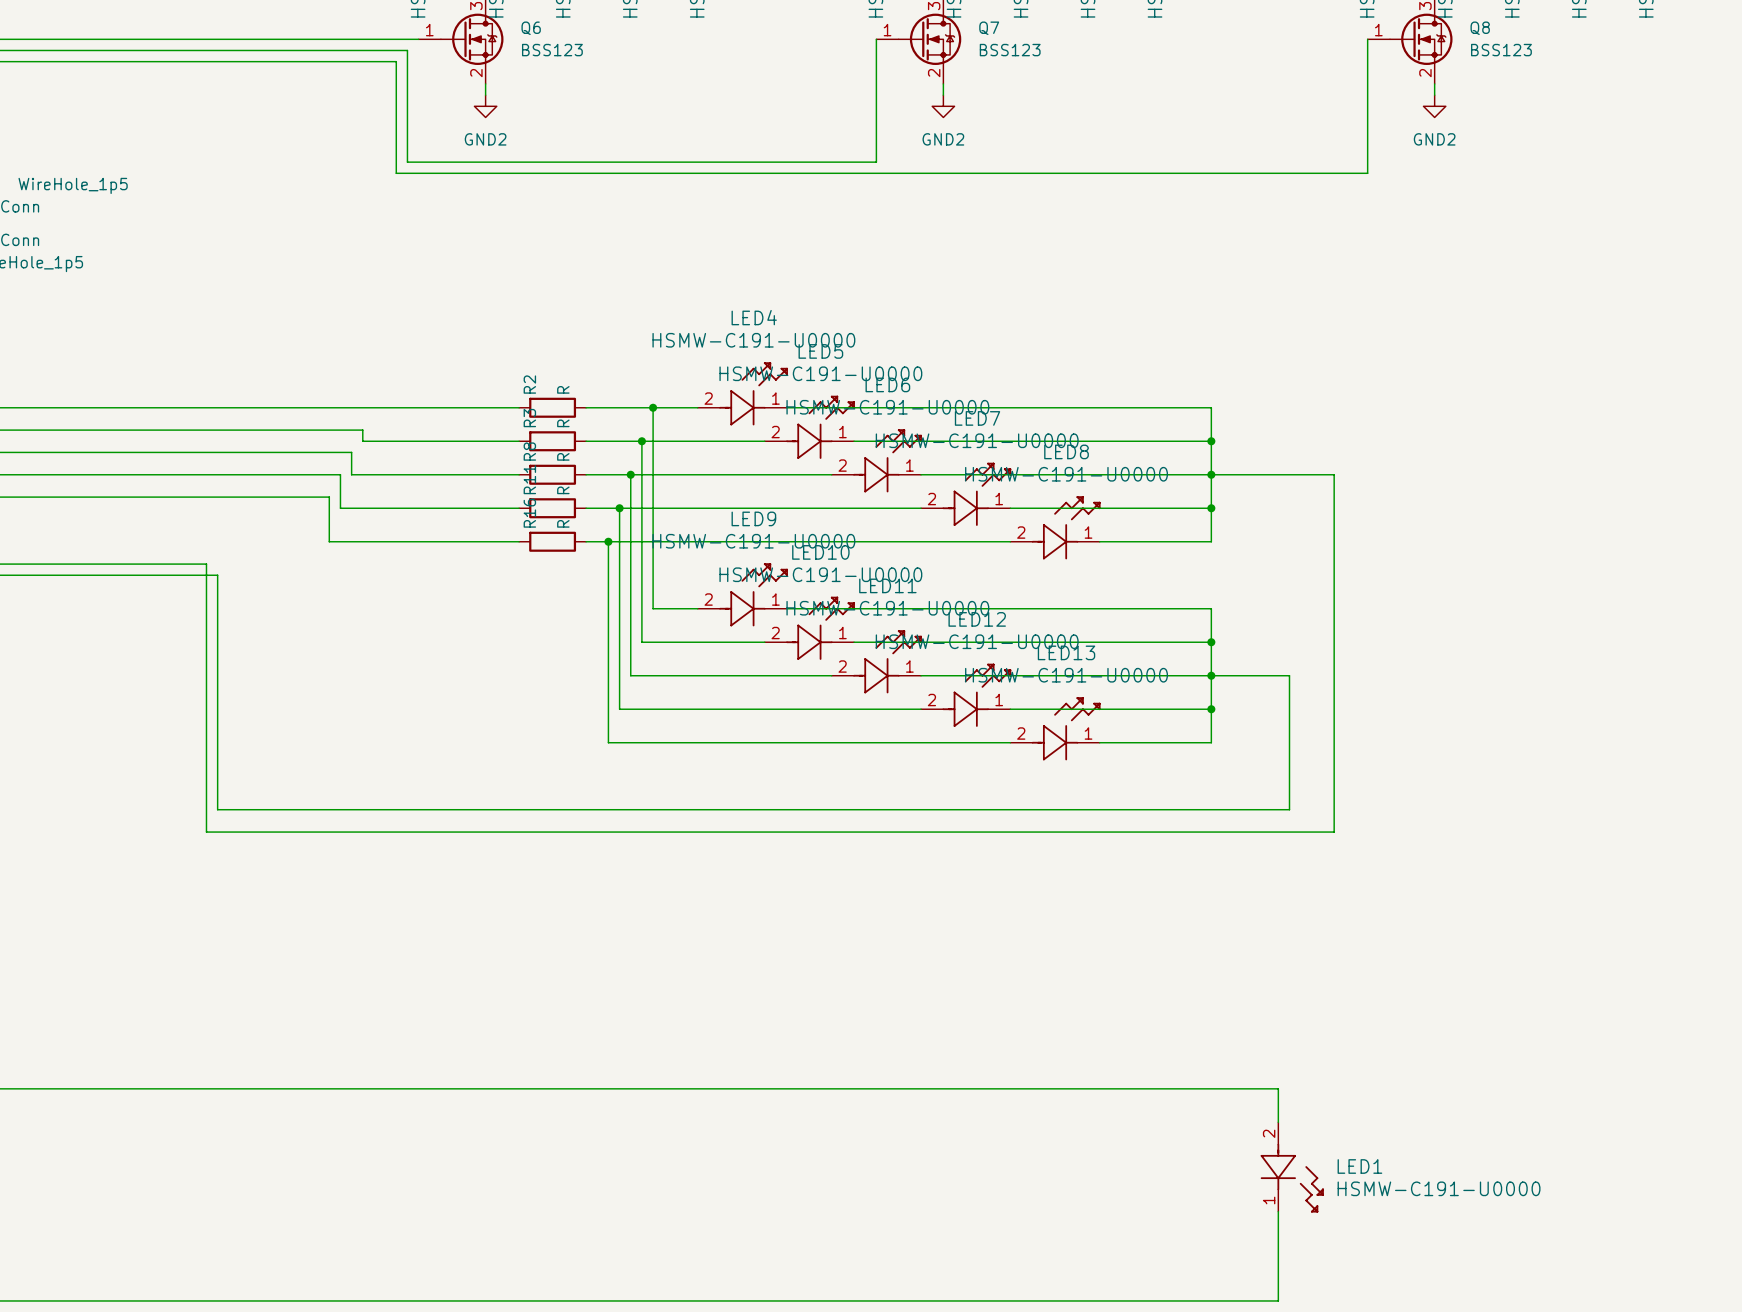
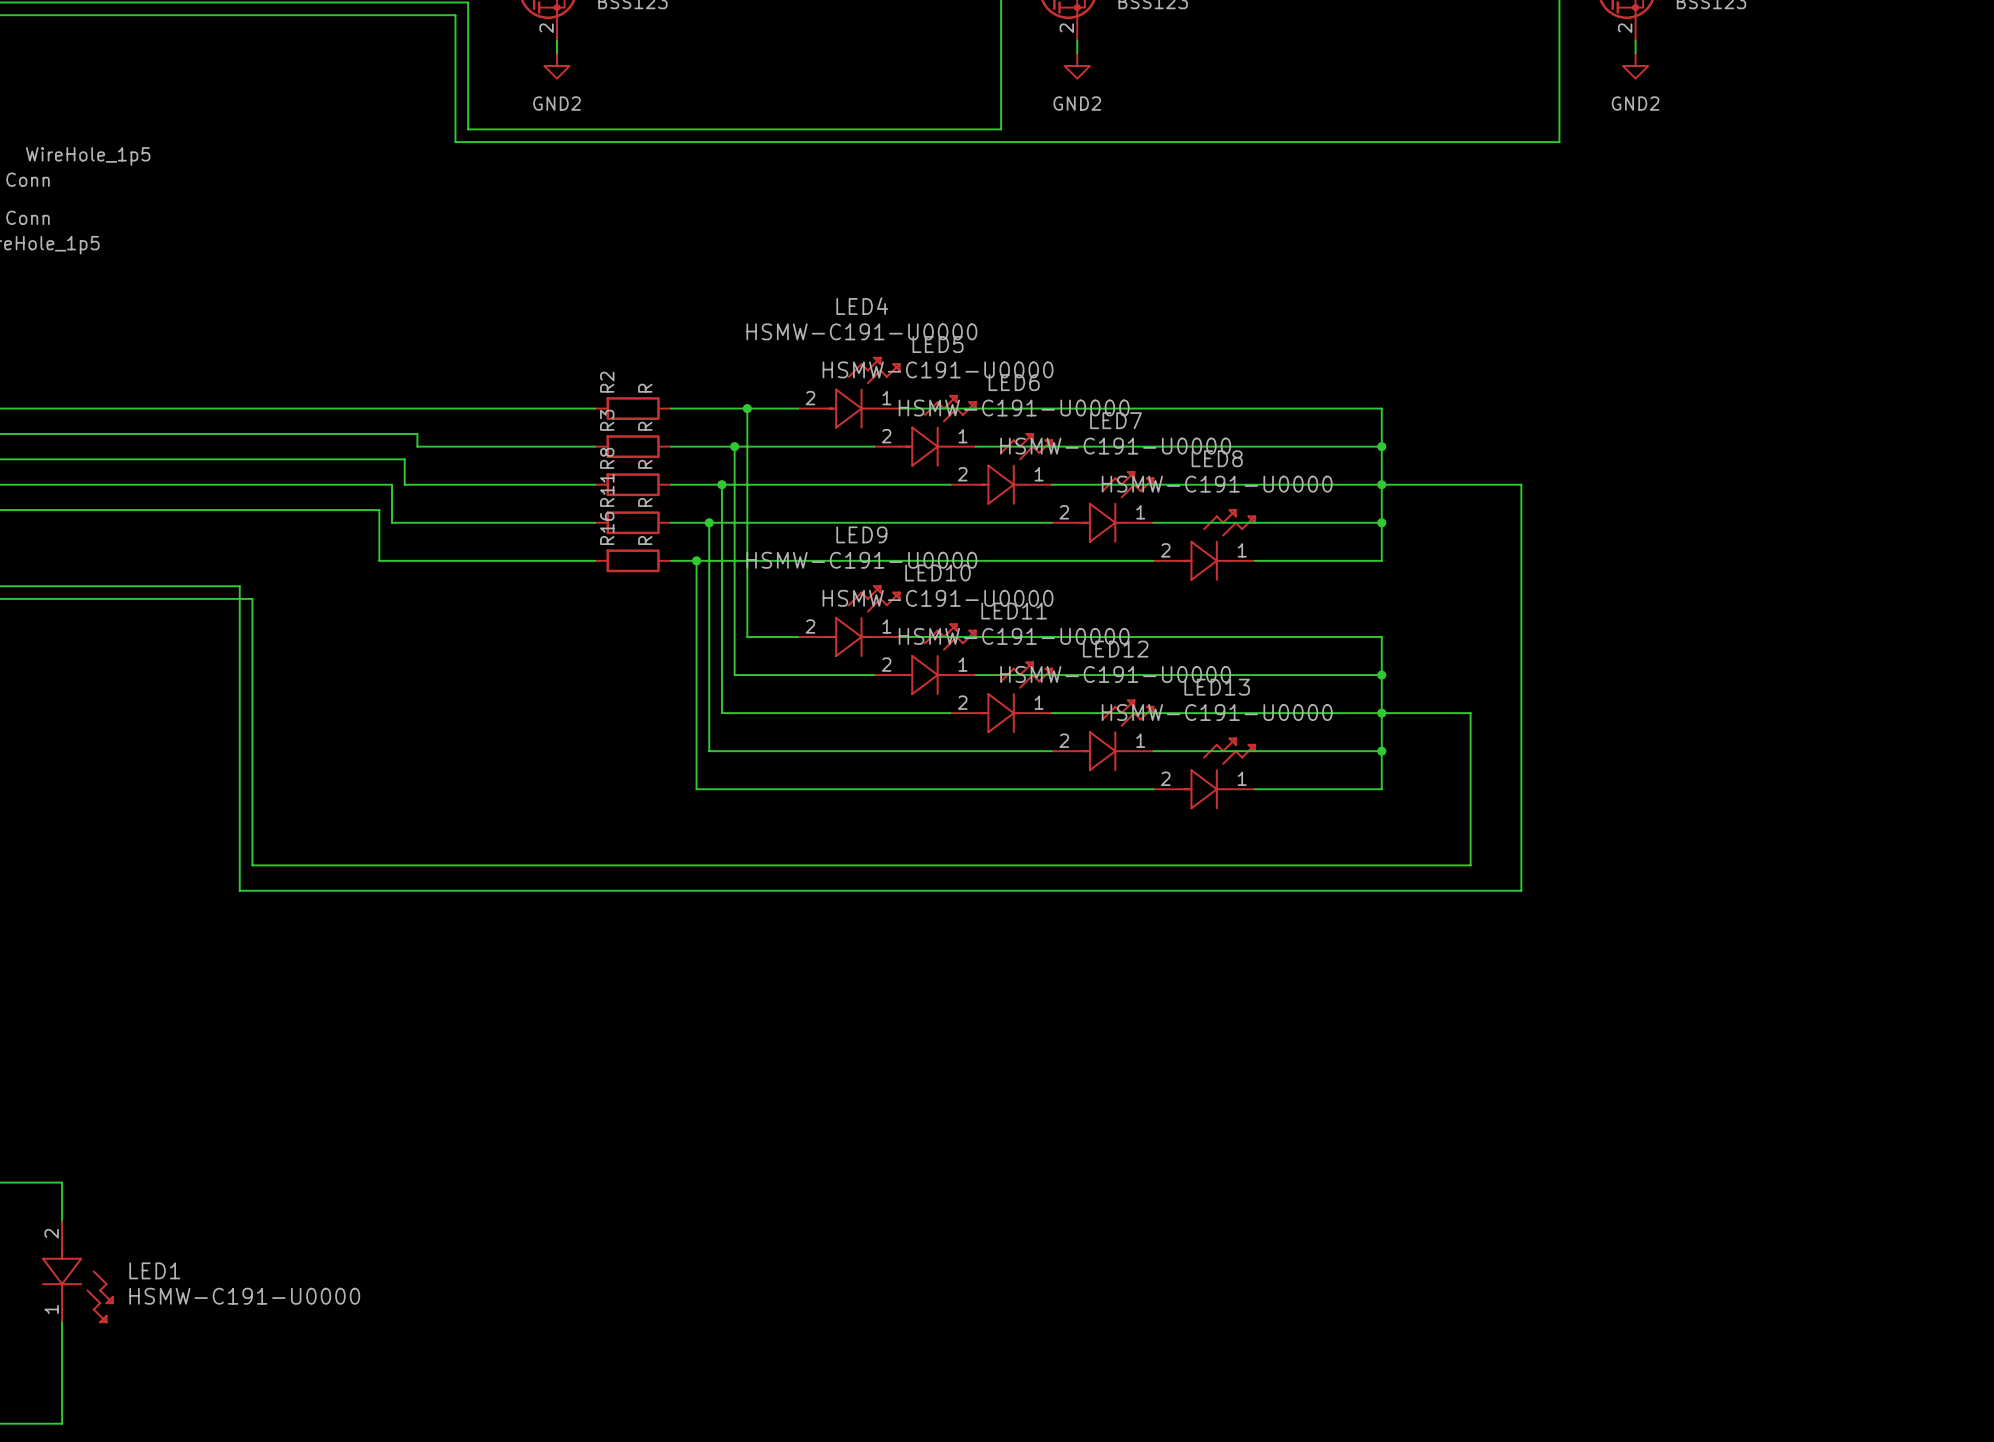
wire: (50, 1088) (1278, 1088) (1278, 1122) -> (62, 1182) (62, 1220)
LED1 position: (1292, 1167) -> (77, 1271)
wire: (1278, 1211) (1278, 1300) (50, 1300) -> (62, 1322) (62, 1423)

